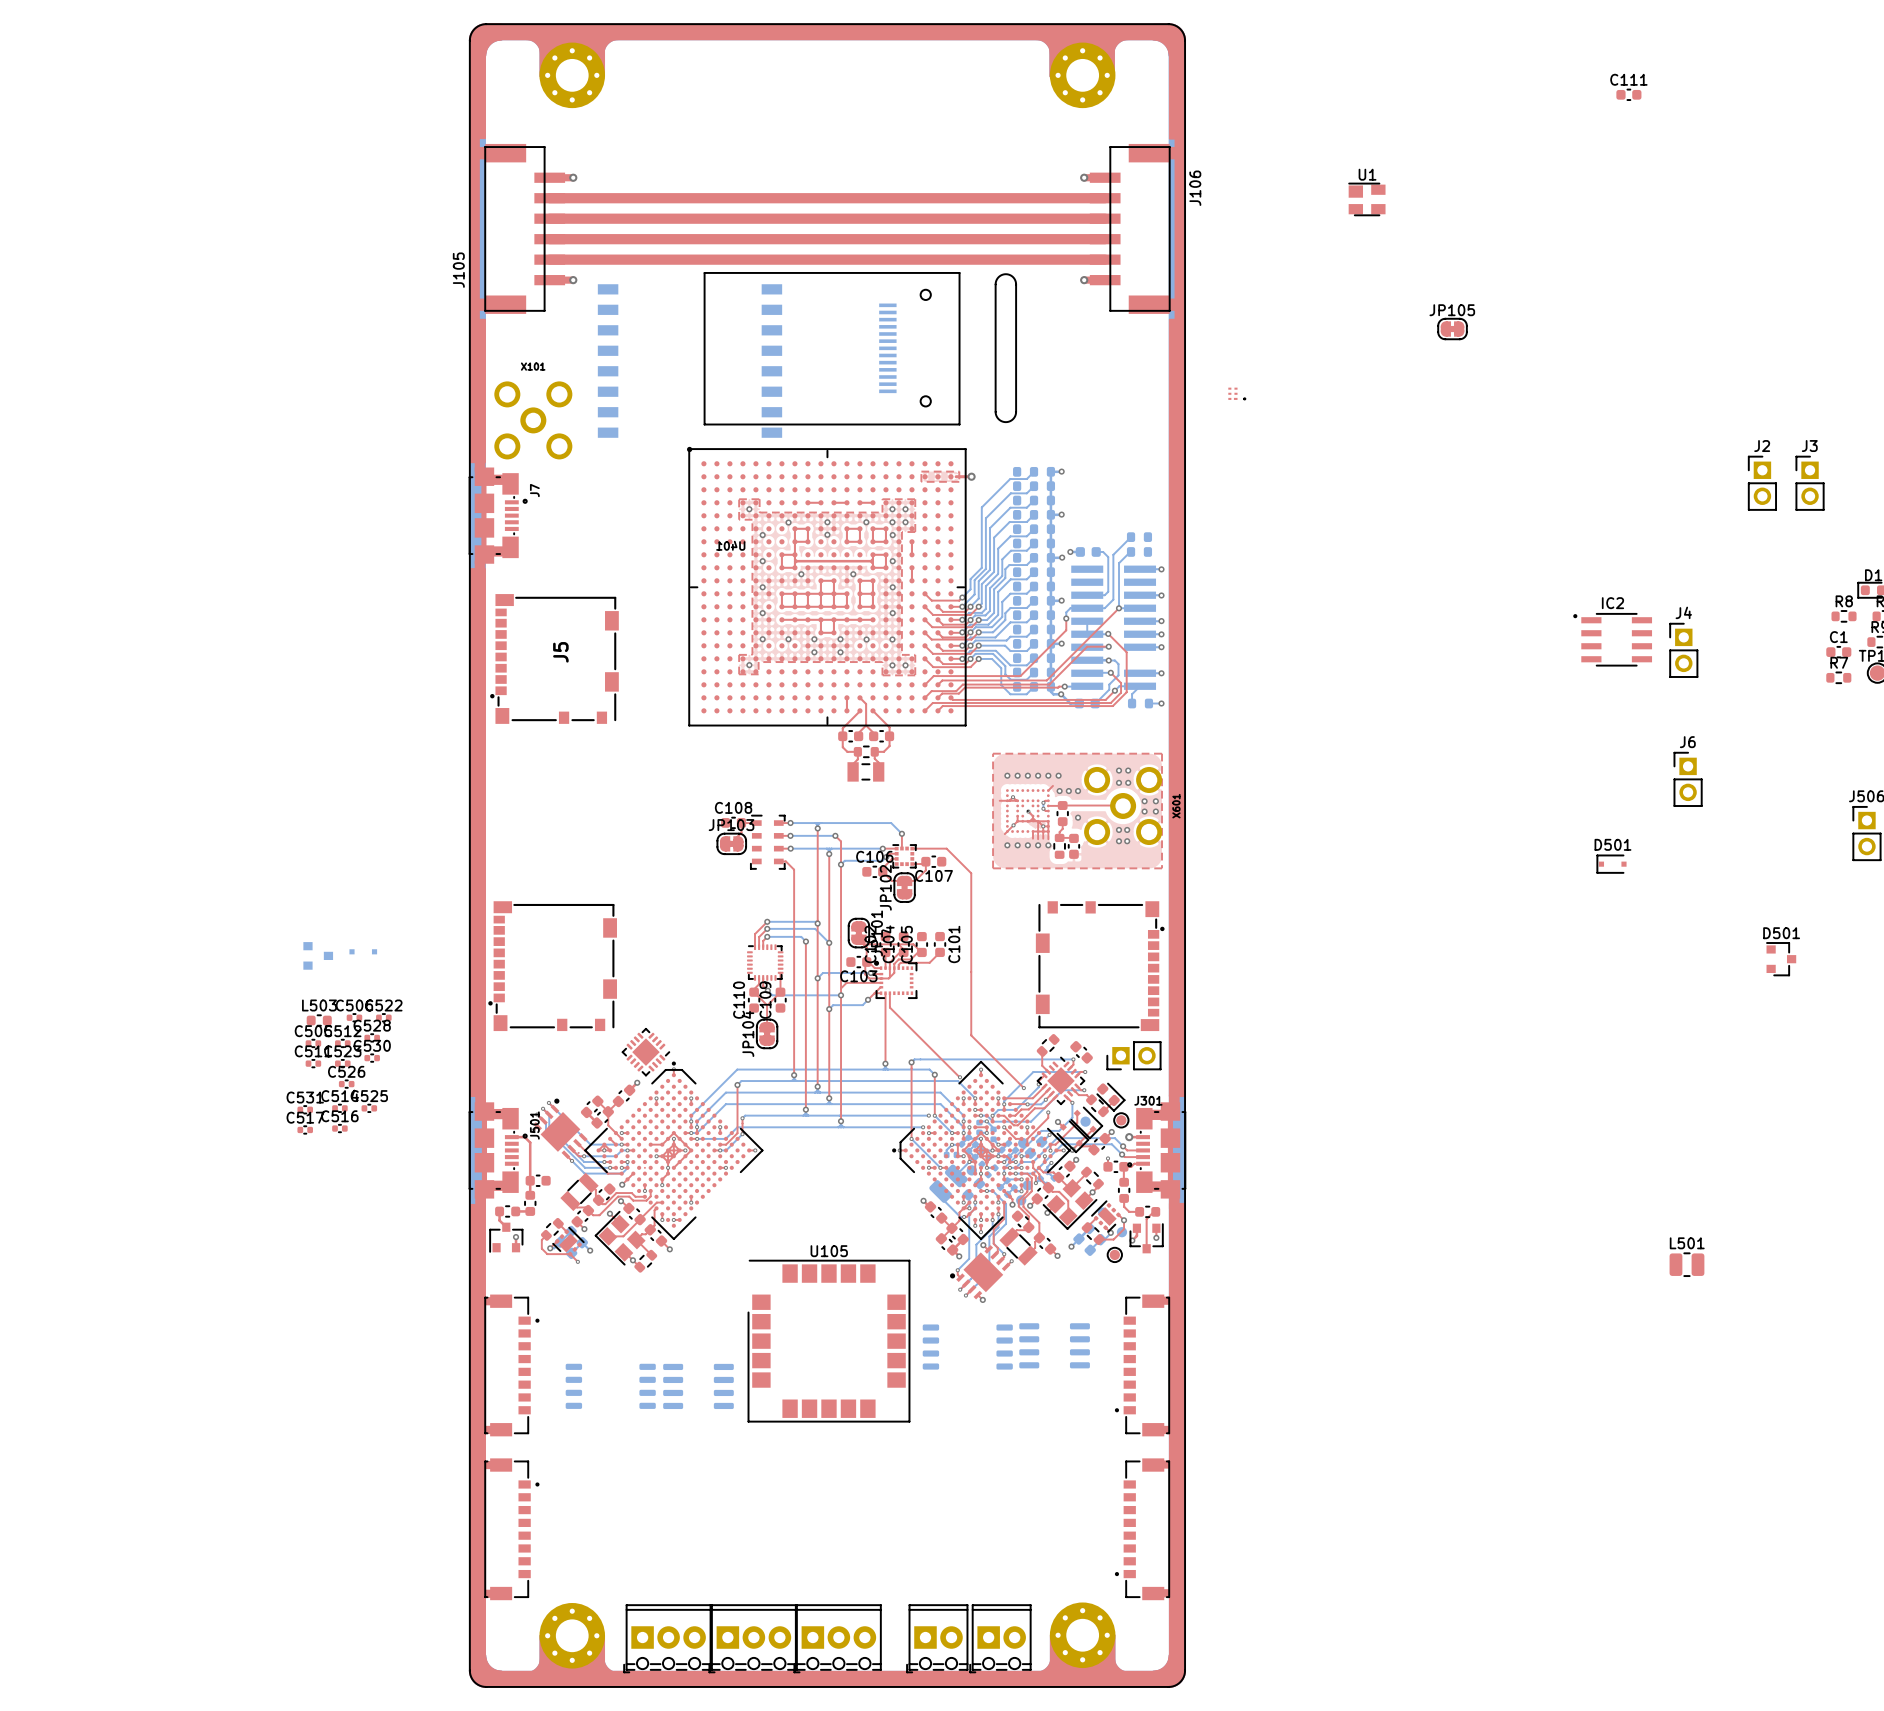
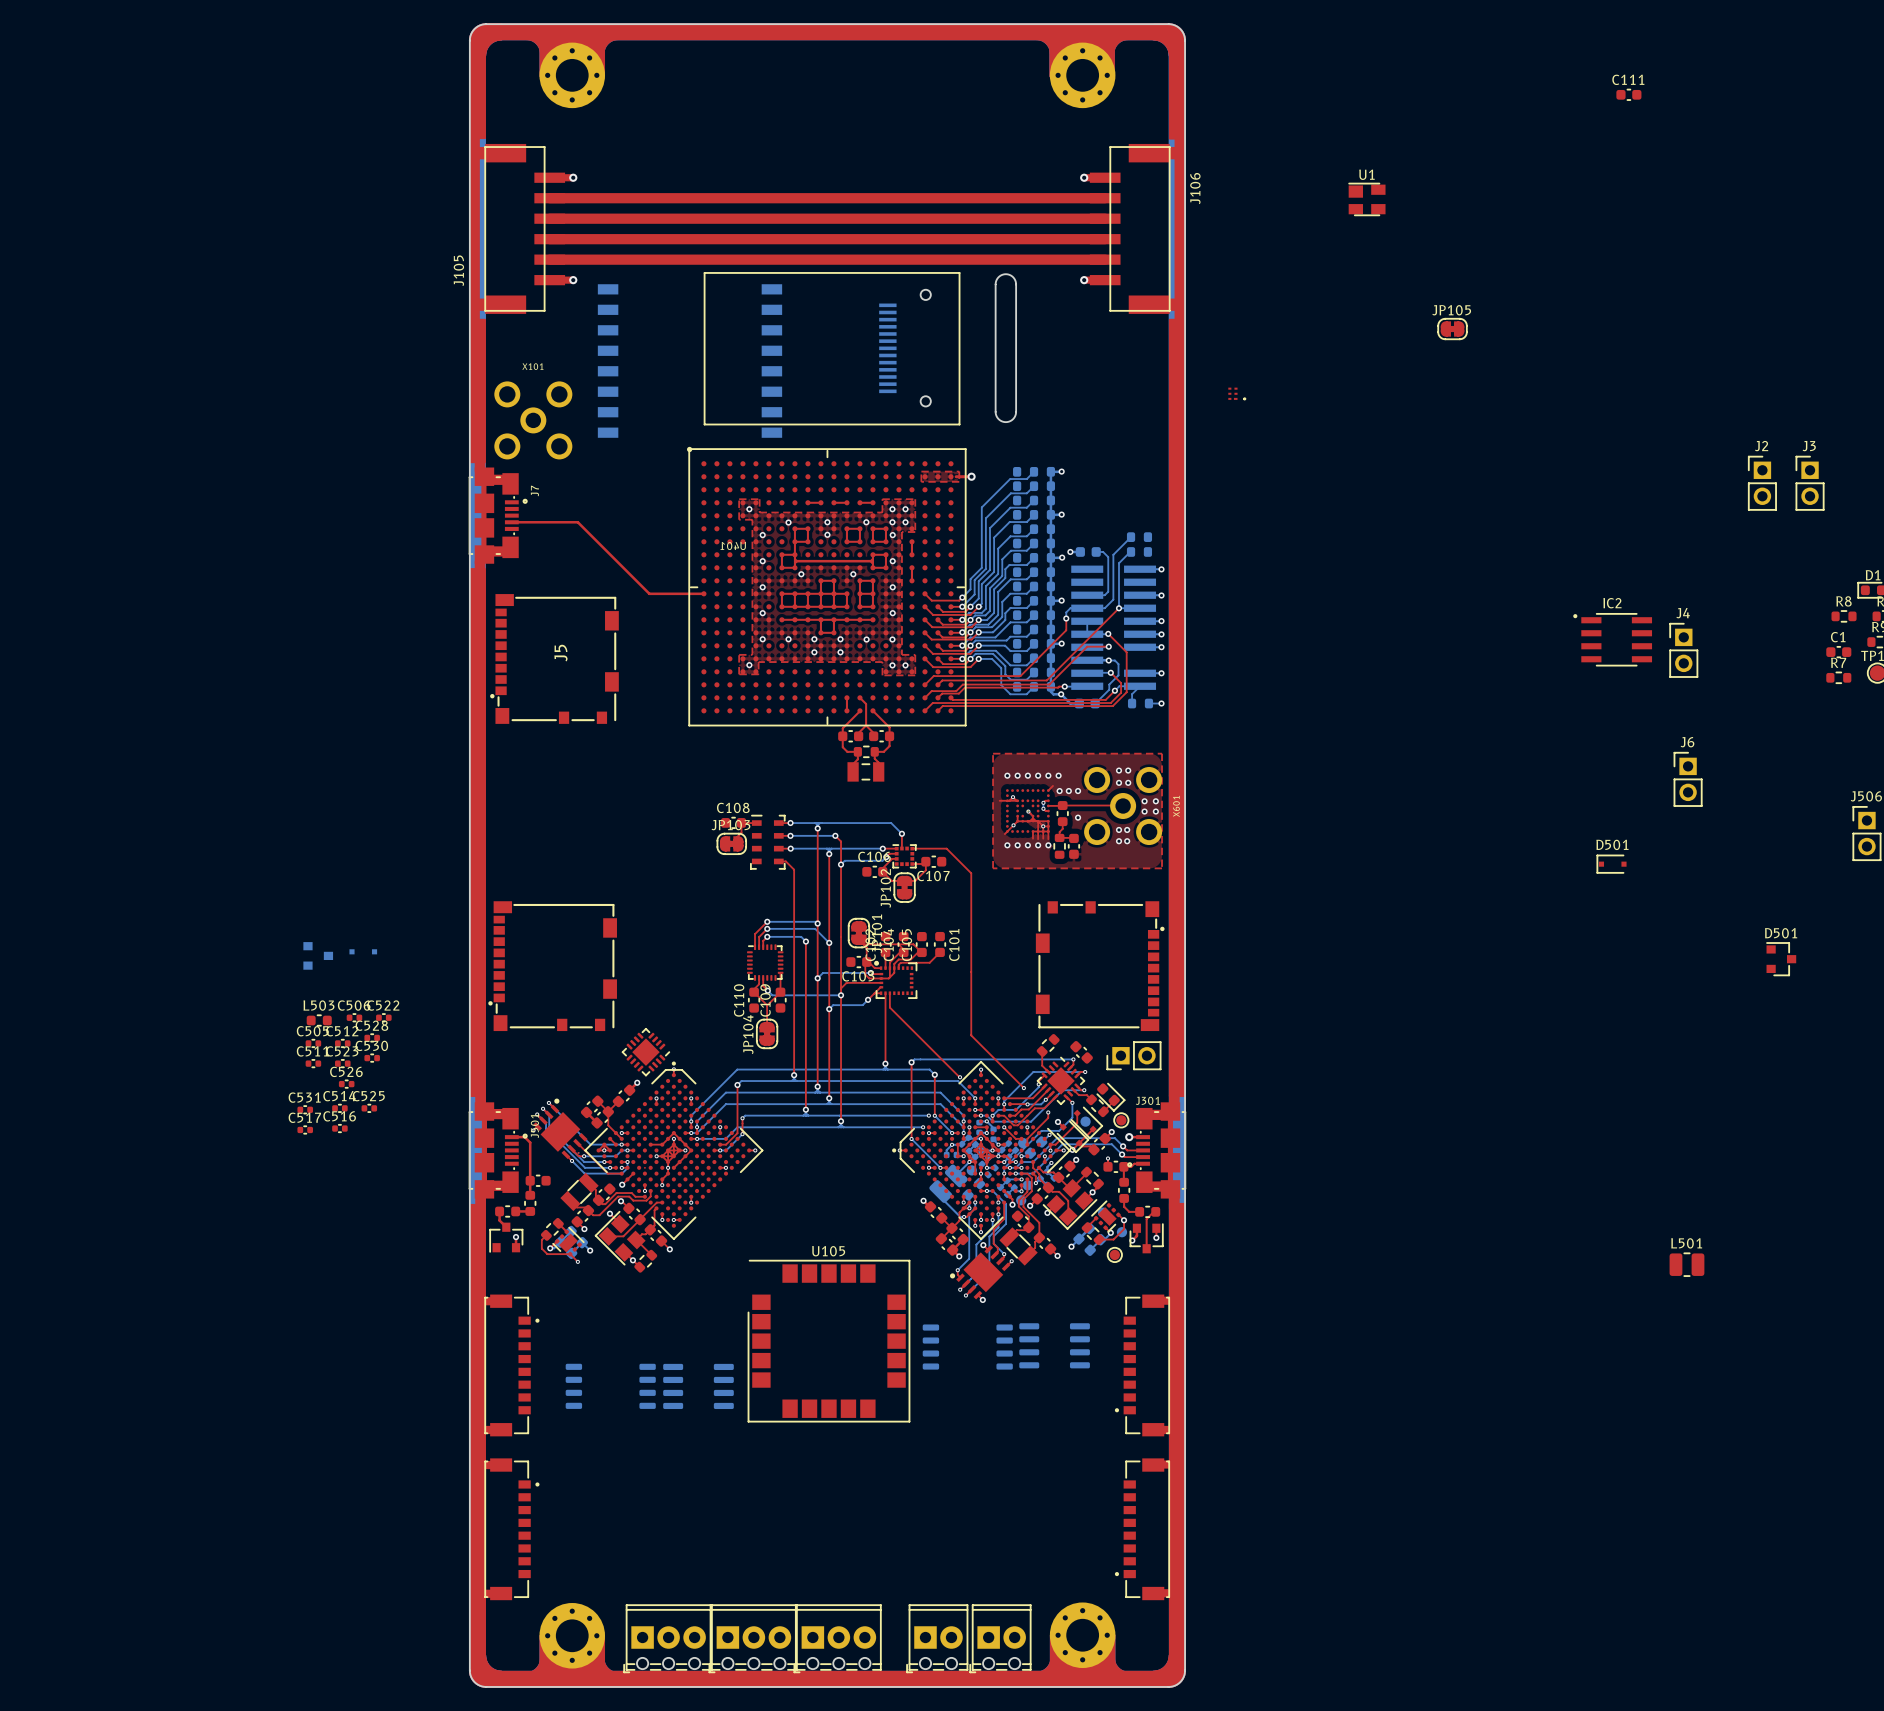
top track: none -> (511, 522) (577, 522) (649, 593) (703, 593)

